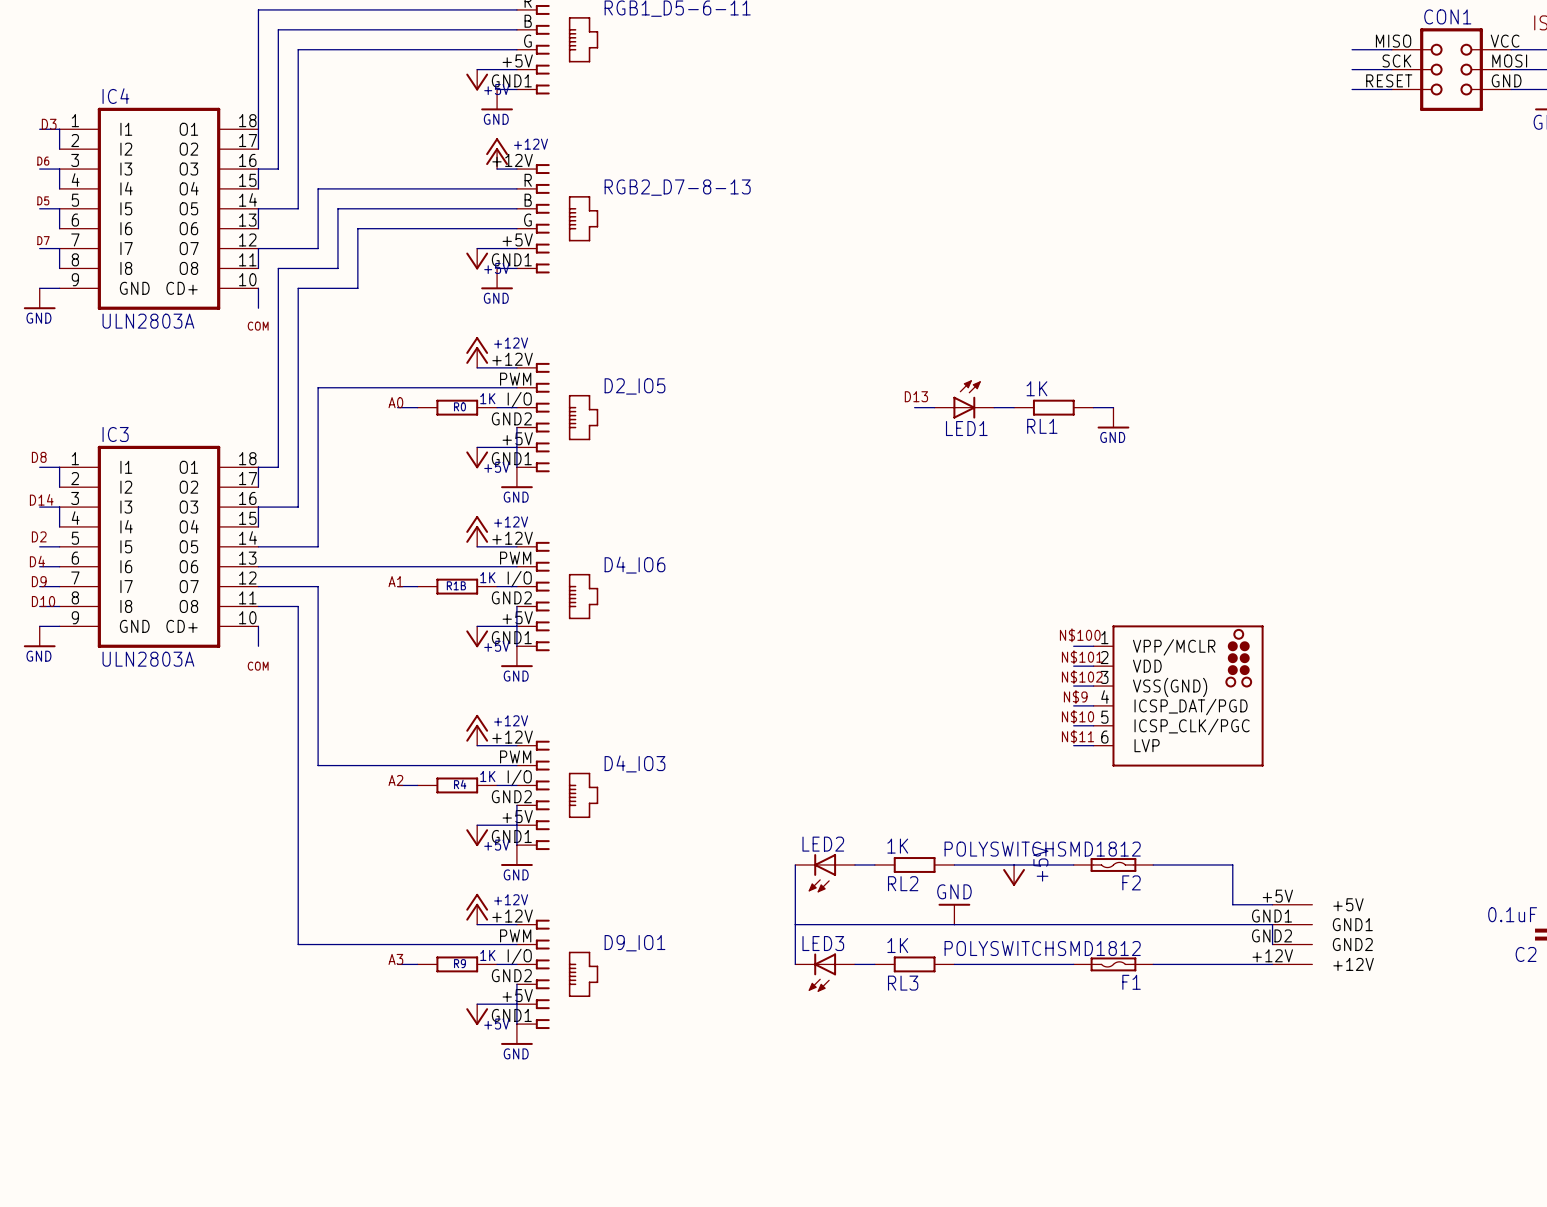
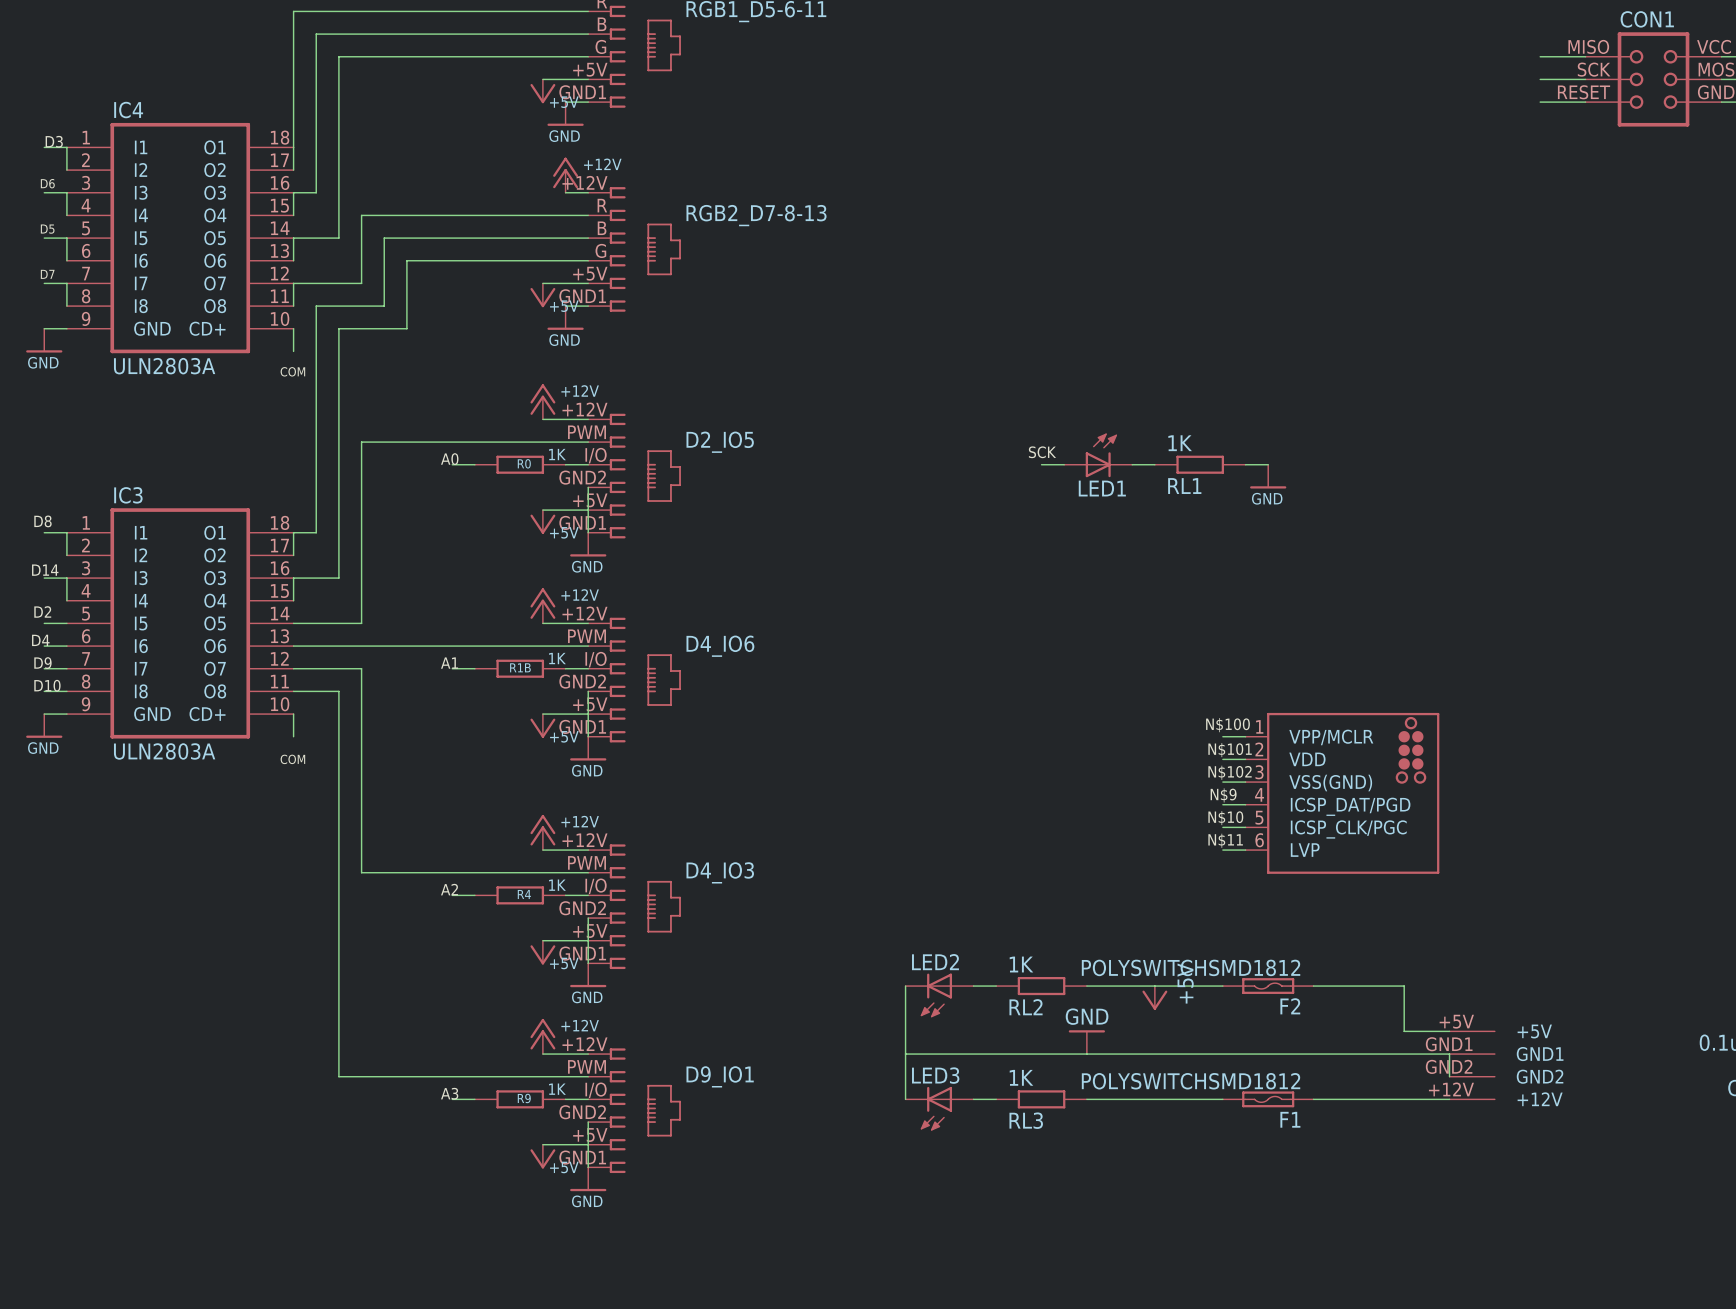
label: D13 (916, 396) -> SCK (1042, 452)

